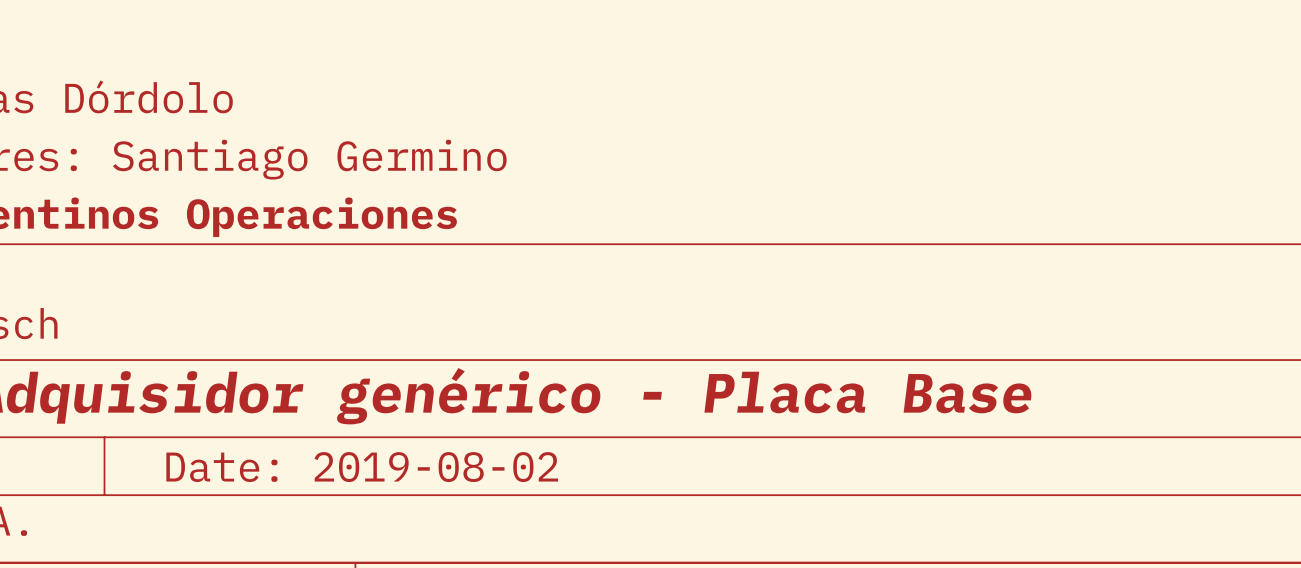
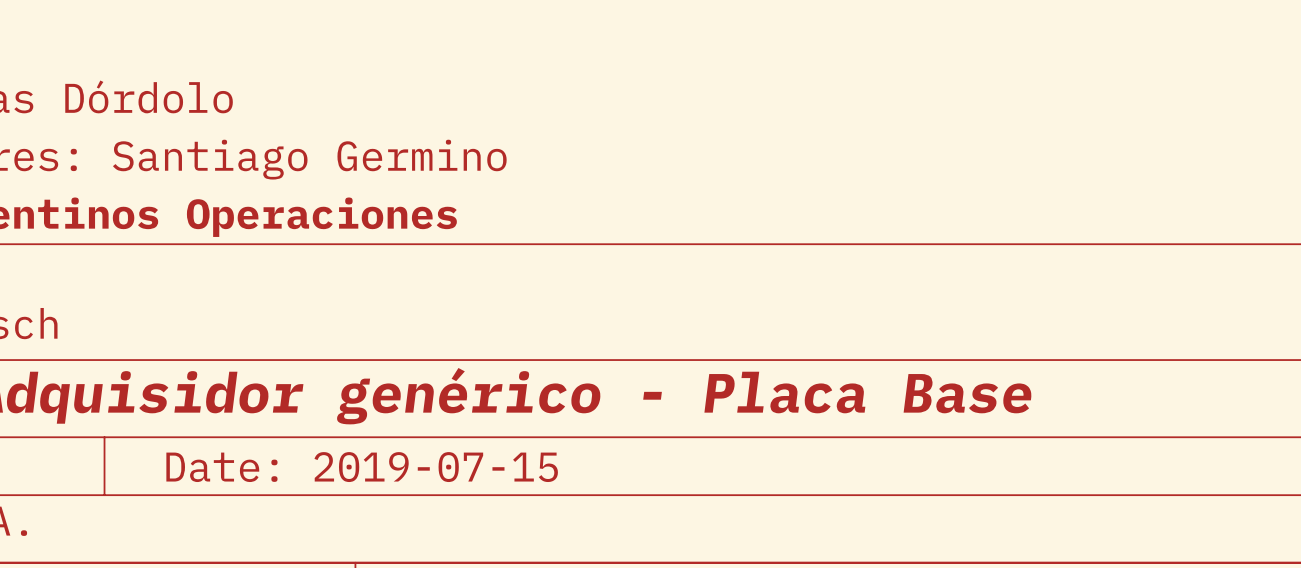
title block: Date: 2019-08-02 (362, 467) -> Date: 2019-07-15 (362, 467)

